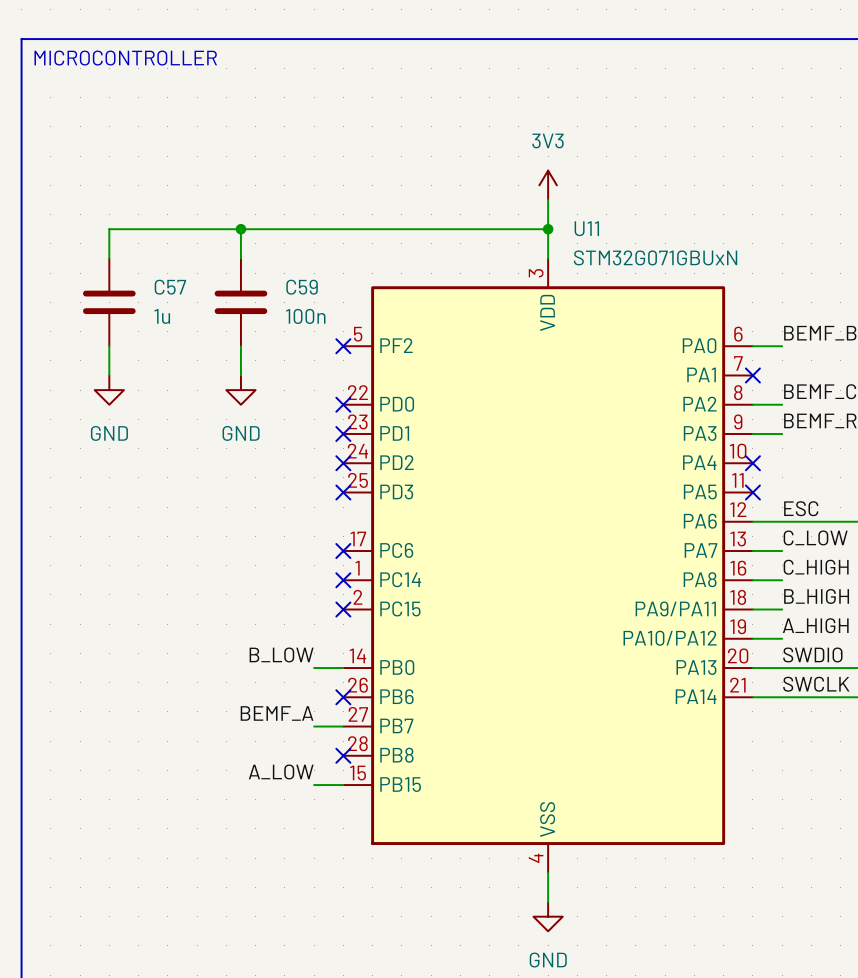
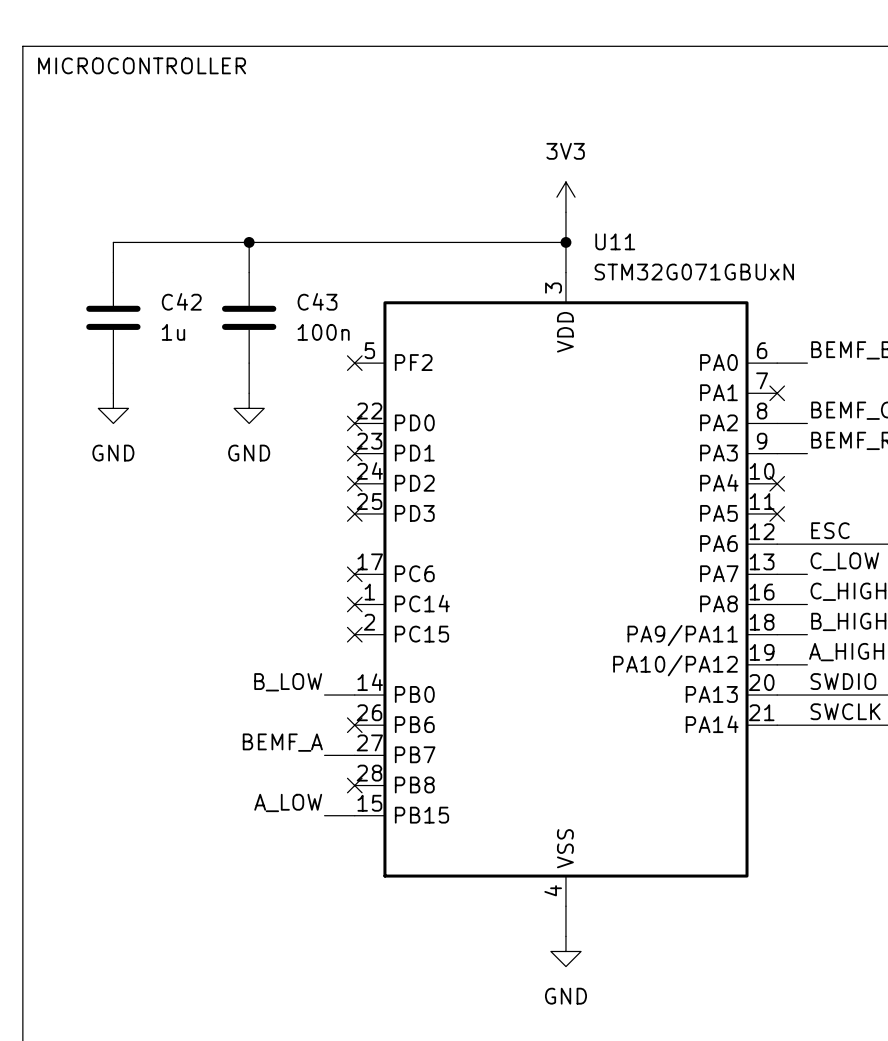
C57 name: C57 (170, 287) -> C42 (181, 301)
C59 name: C59 (302, 287) -> C43 (317, 301)

